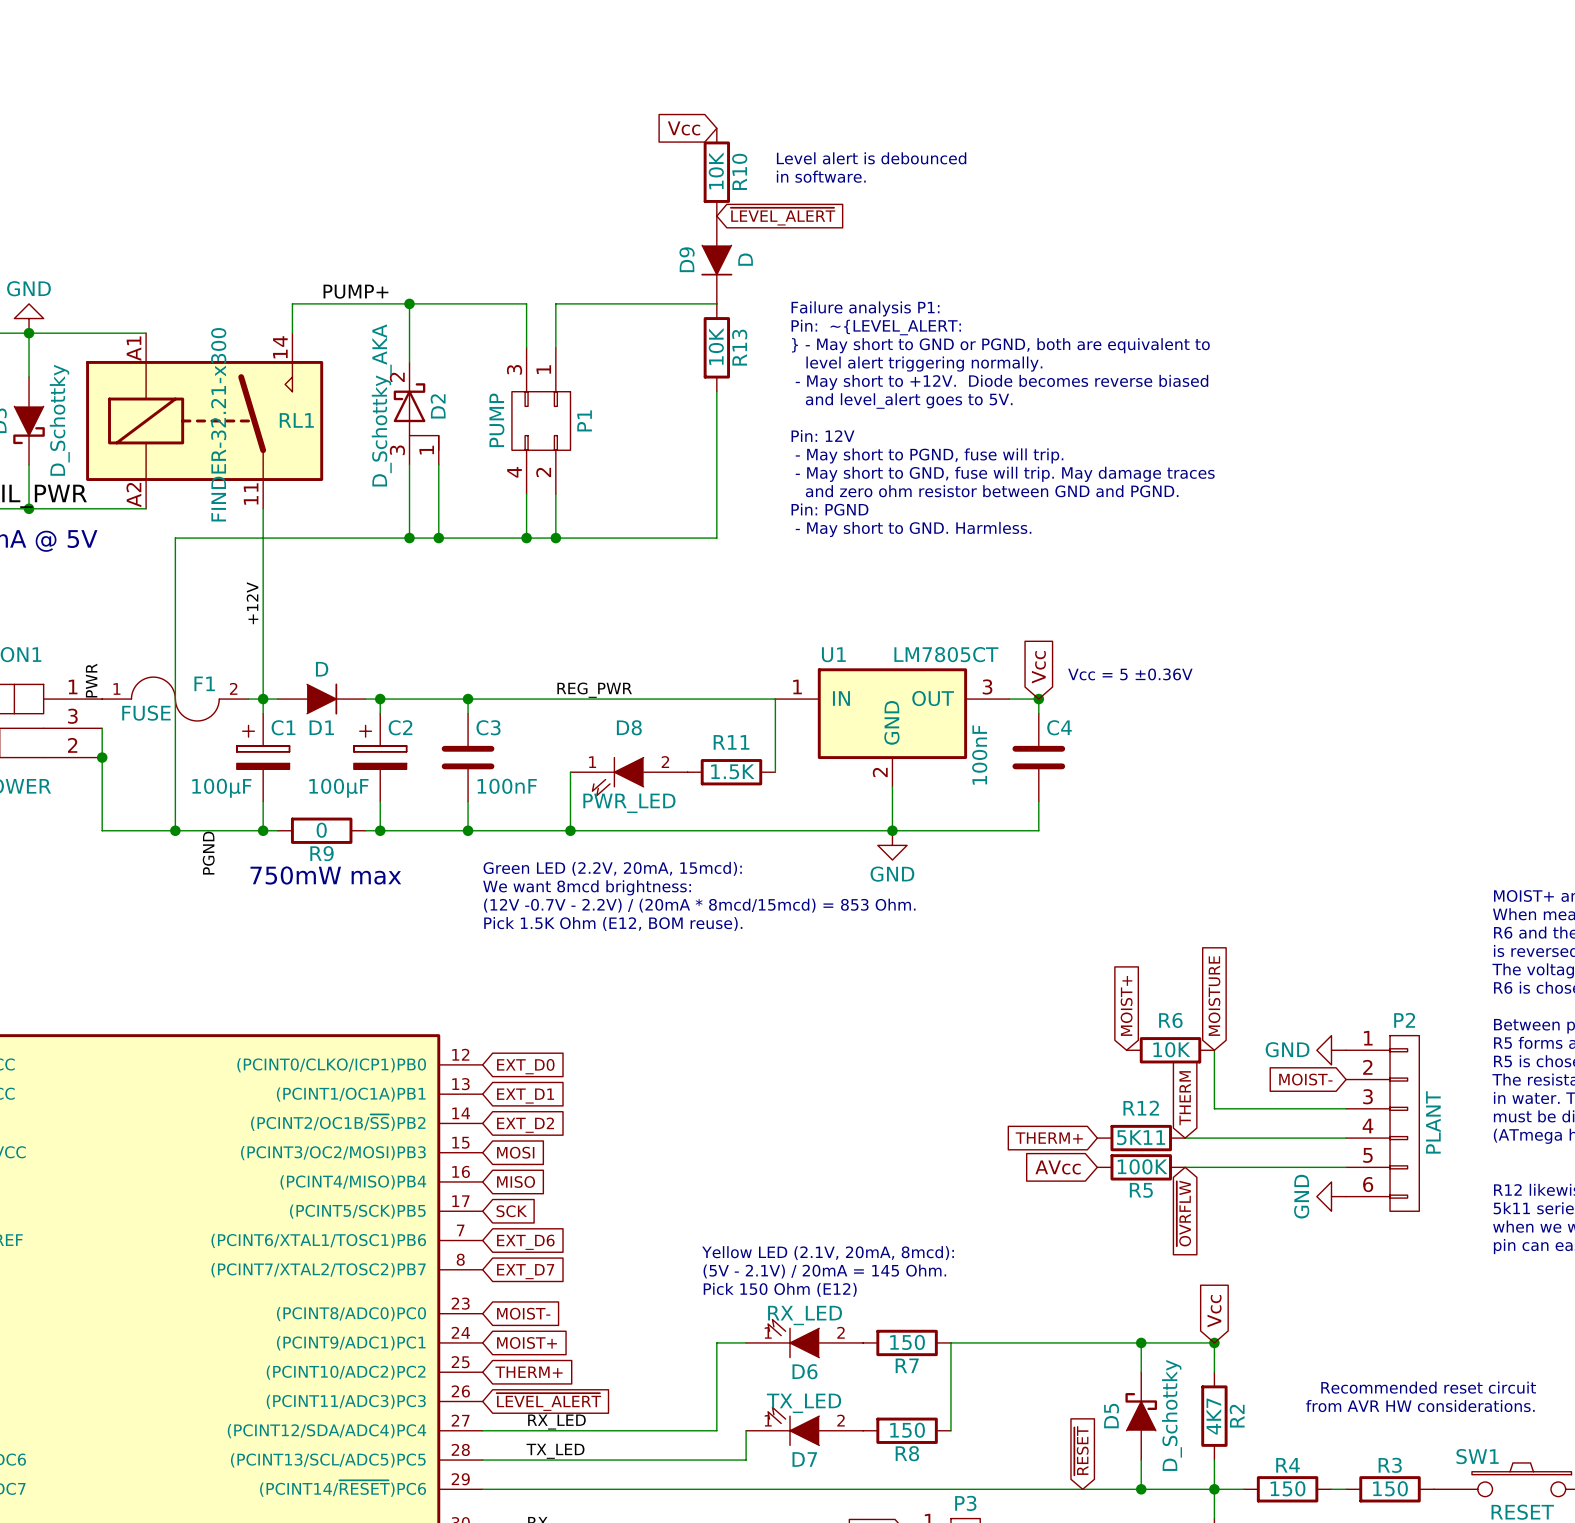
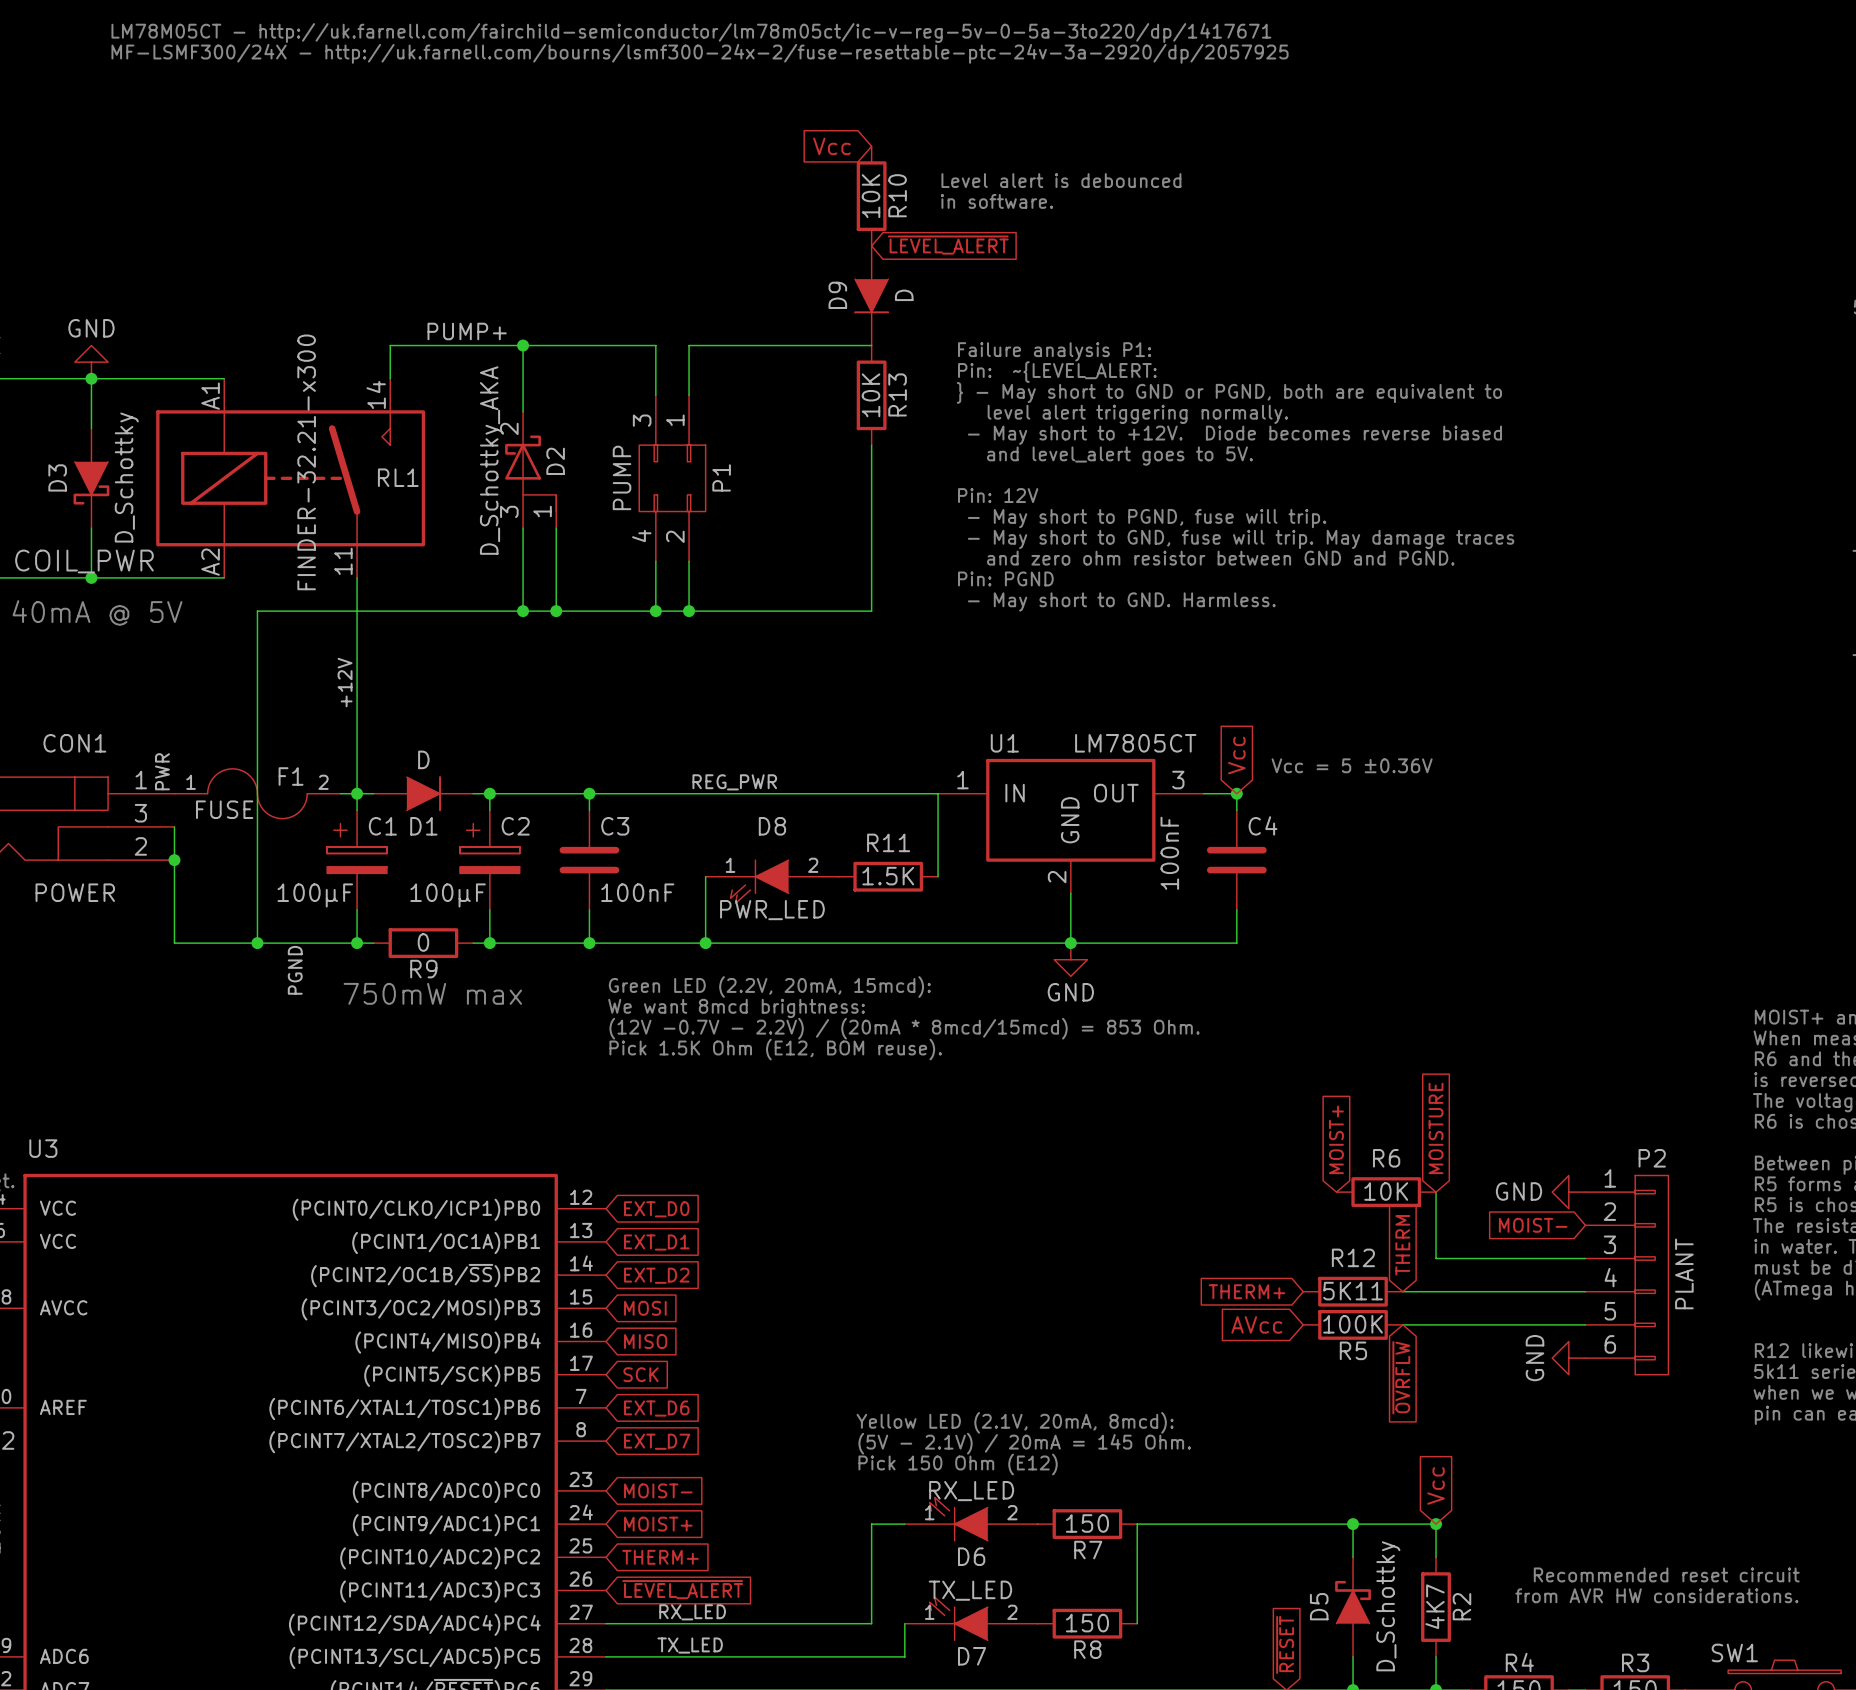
text: none -> LM78M05CT - http://uk.farnell.com/fairchild-semiconductor/lm78m05ct/ic-v-reg-5v-0-5a-3to220/dp/1417671 (691, 33)
text: none -> MF-LSMF300/24X - http://uk.farnell.com/bourns/lsmf300-24x-2/fuse-resettable-ptc-24v-3a-2920/dp/2057925 (700, 53)

